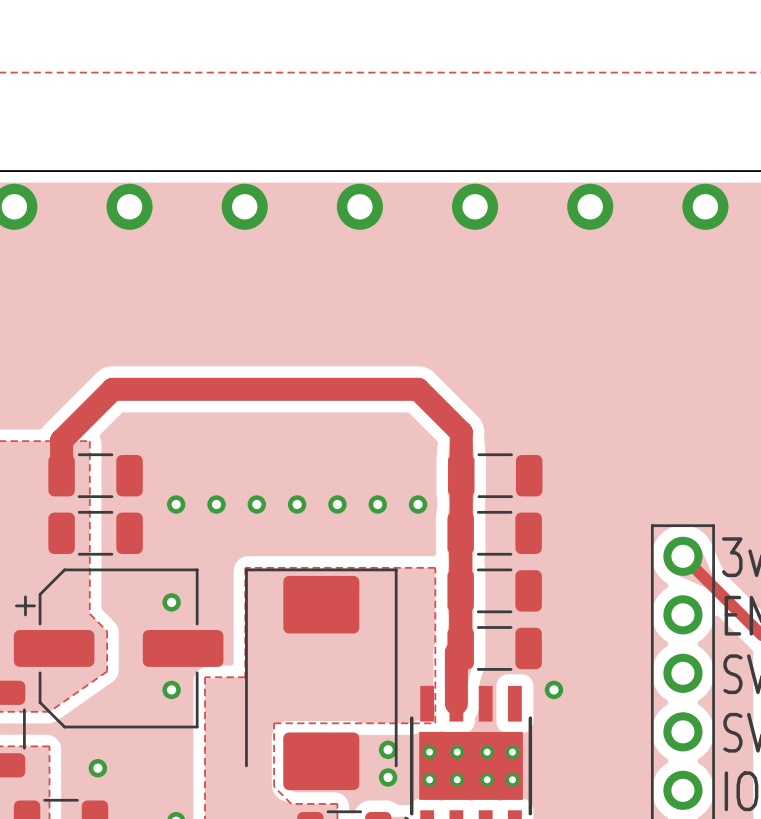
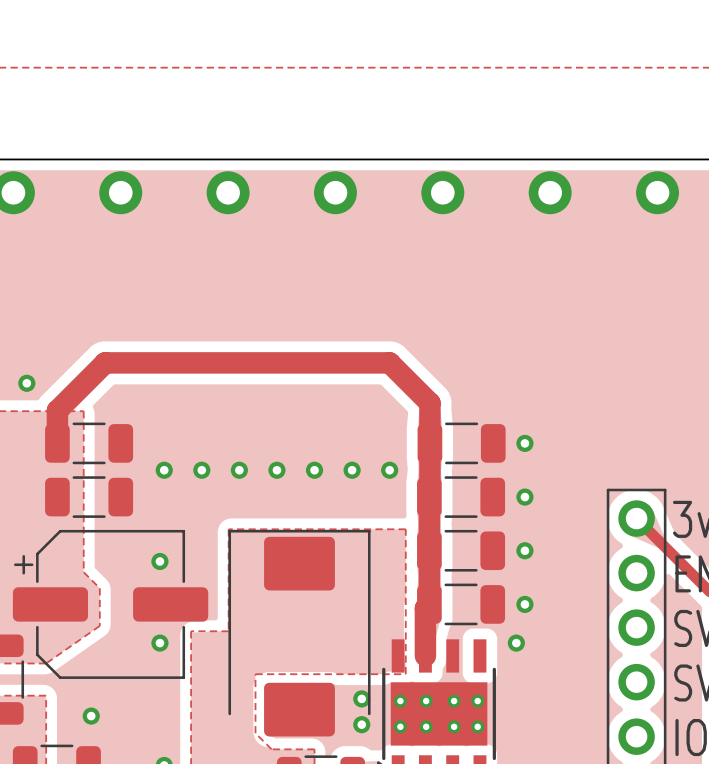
via: none -> (26, 383)
via: none -> (524, 443)
via: none -> (524, 497)
via: none -> (524, 550)
via: none -> (524, 604)

